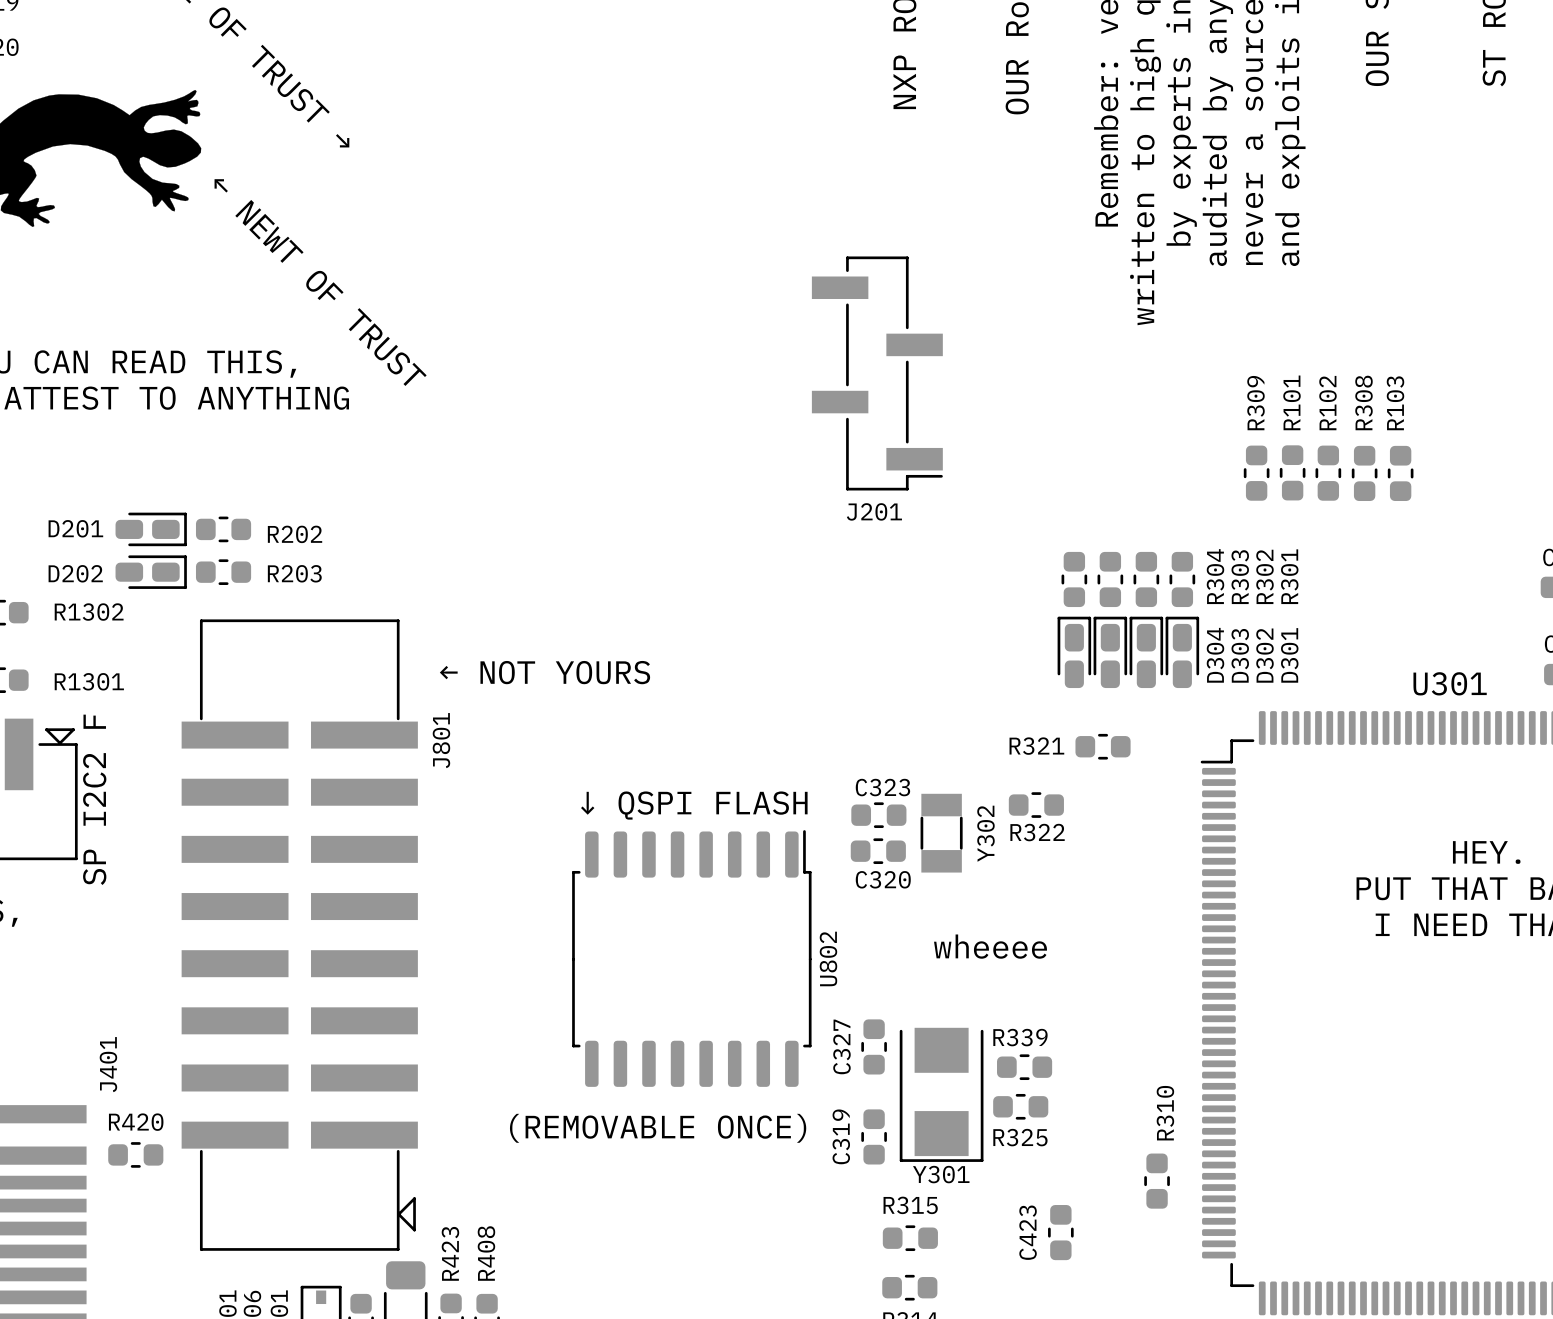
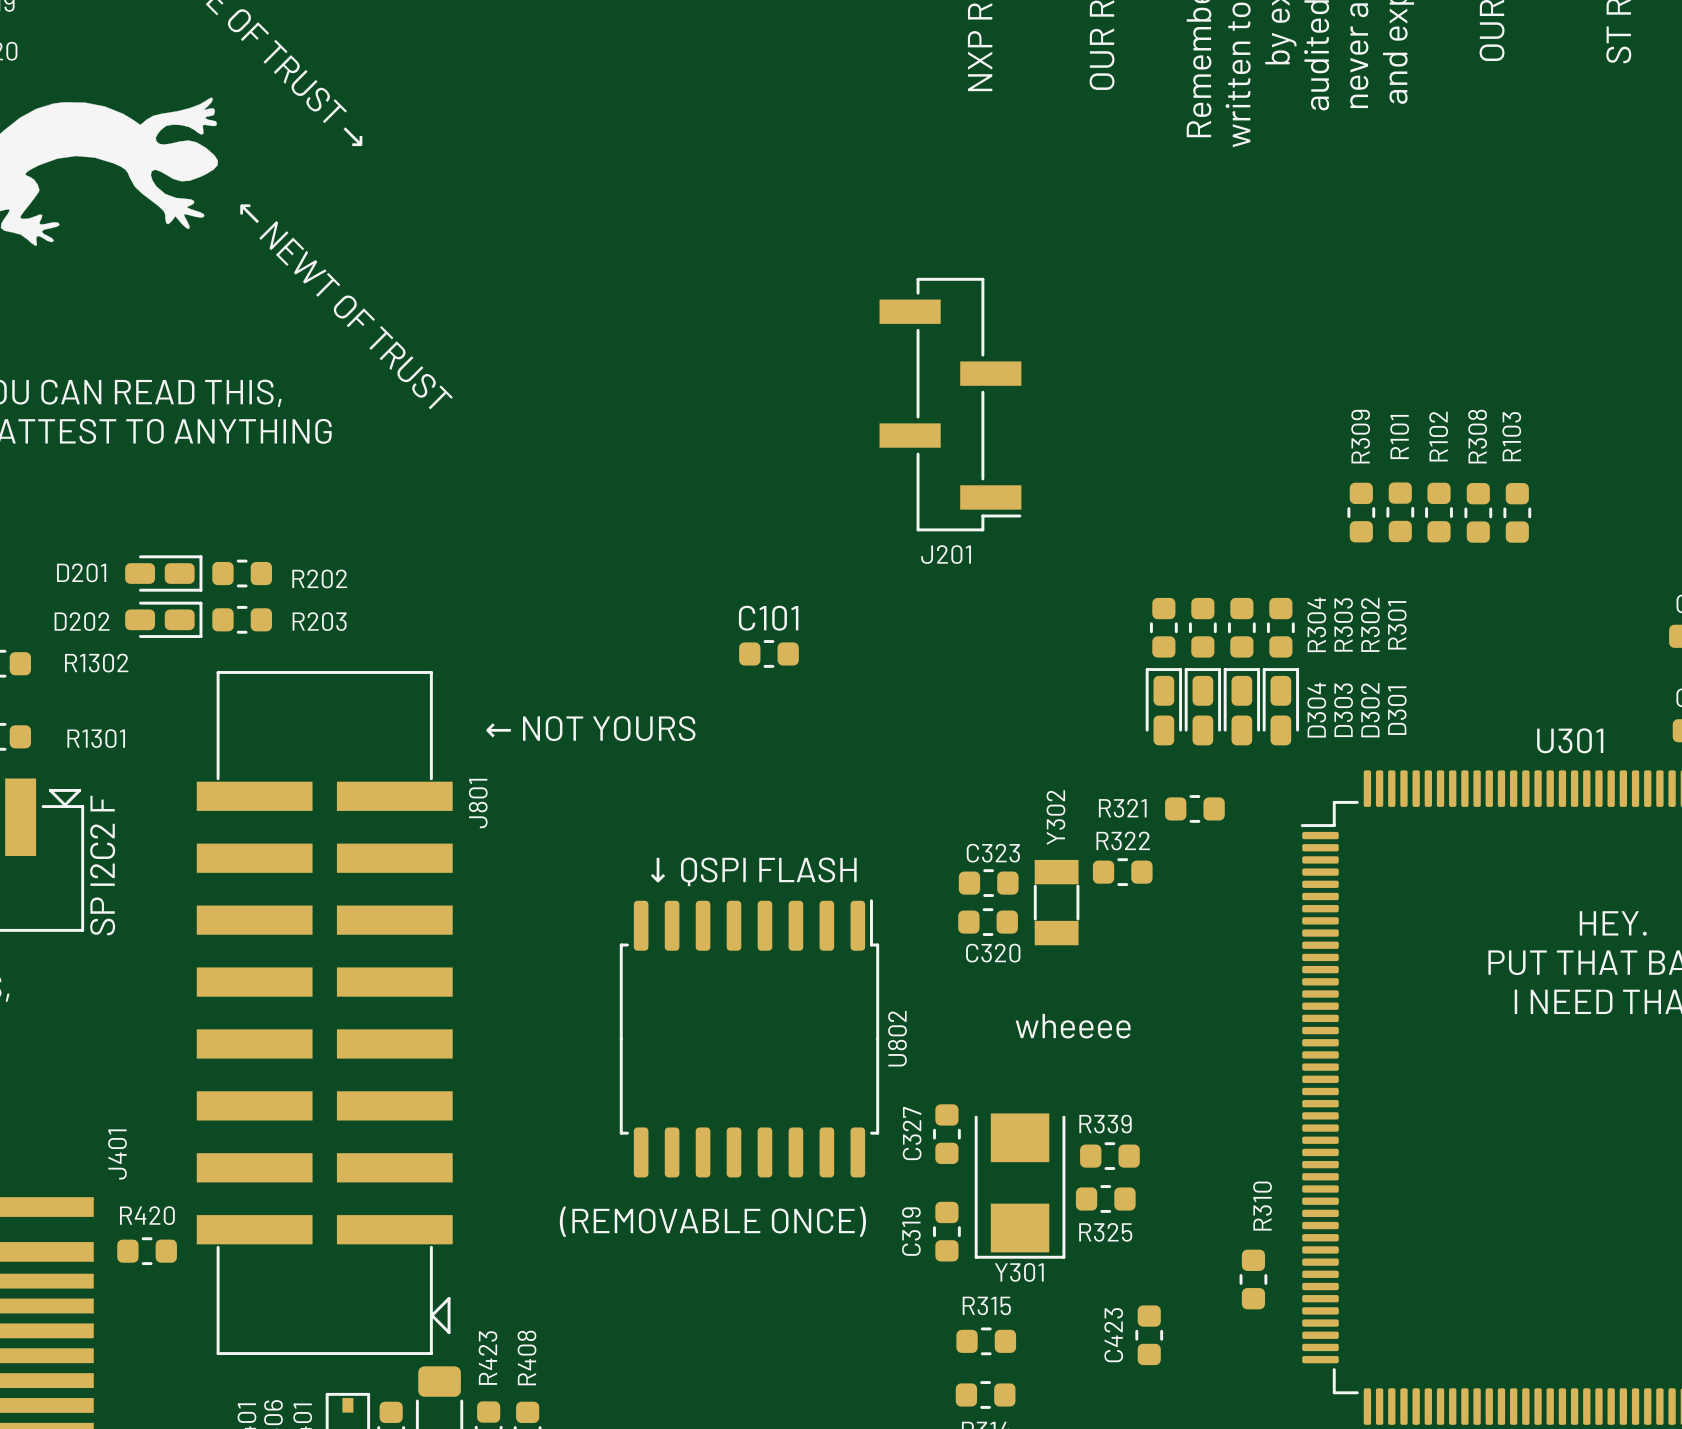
C101: none -> (768, 653)
C323 position: (878, 815) -> (988, 883)
R322 name position: R322 (1037, 832) -> R322 (1123, 840)
Y302 position: (941, 833) -> (1056, 902)
Y302 name position: Y302 (985, 833) -> Y302 (1055, 817)
C320 position: (878, 851) -> (988, 922)

